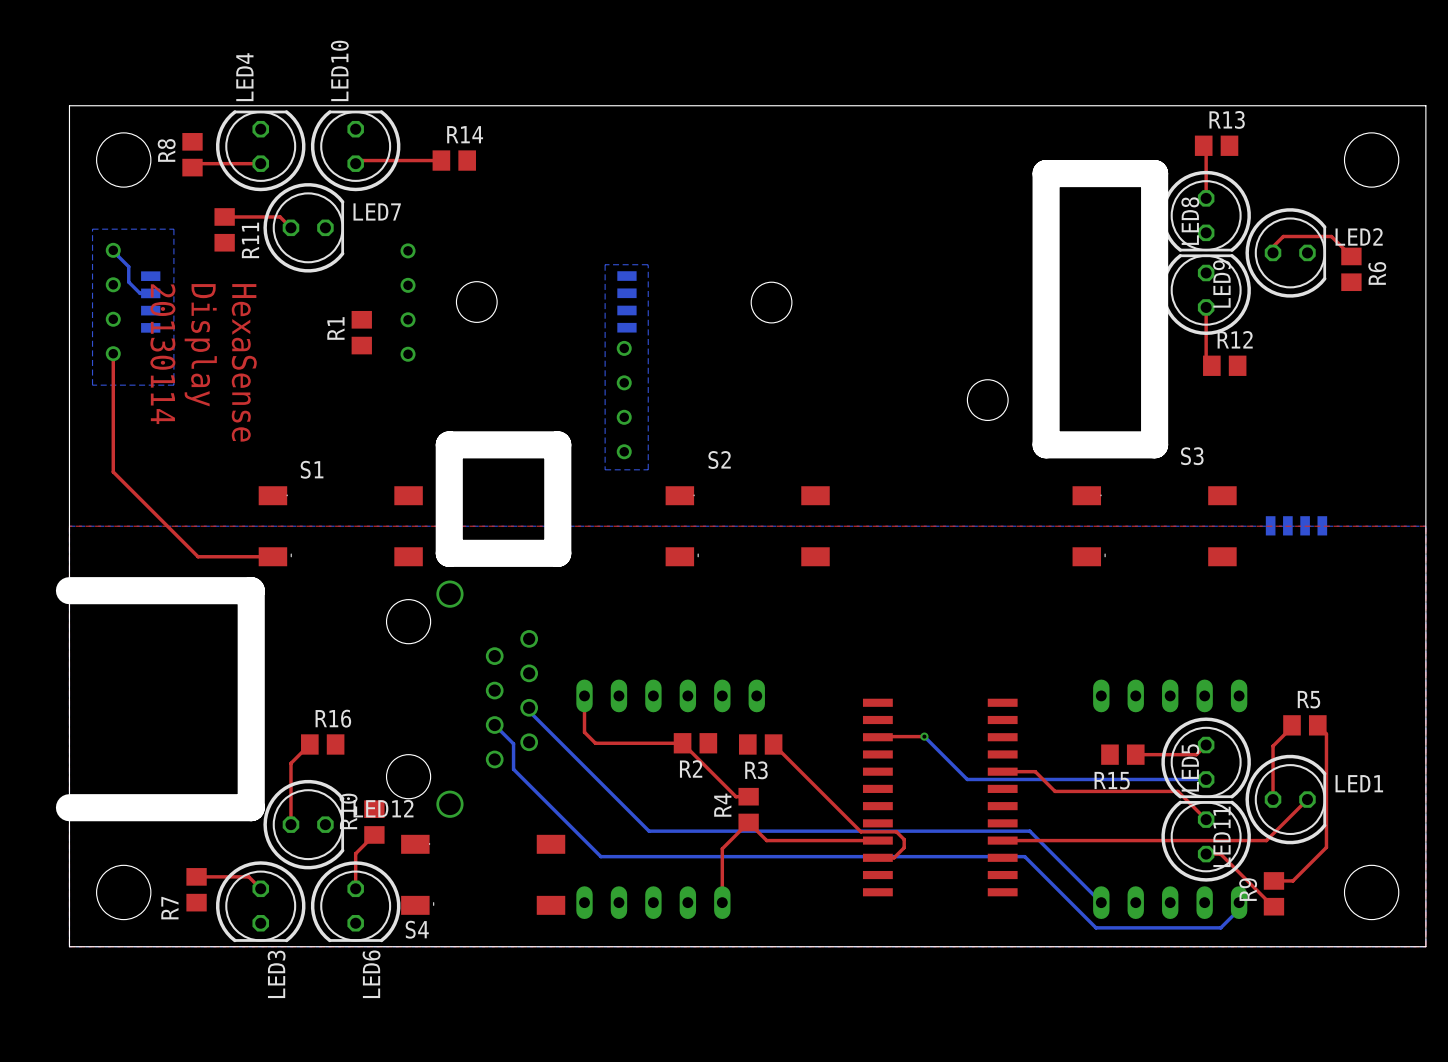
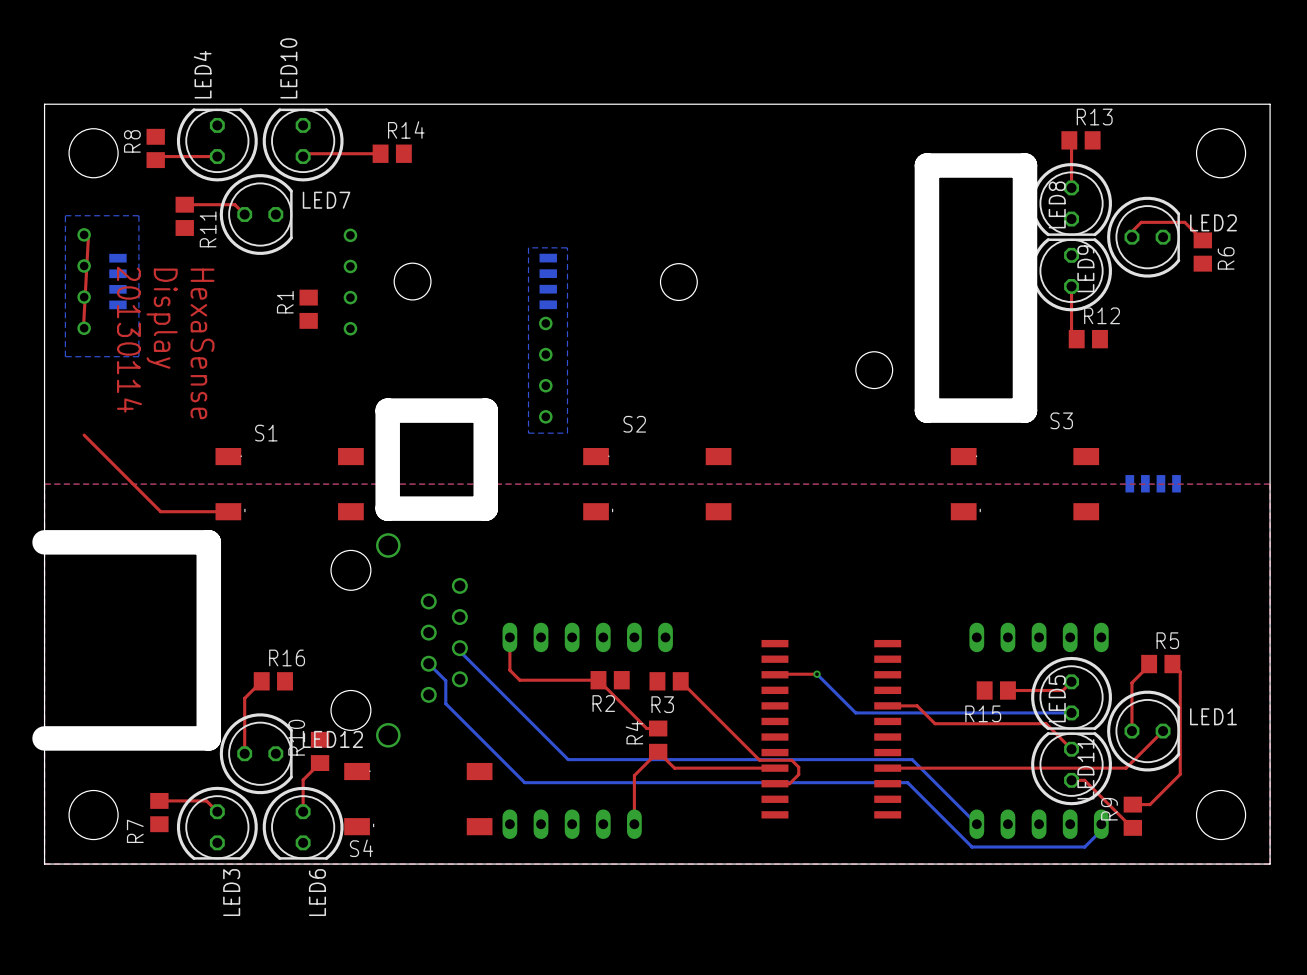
bottom track: (113, 250) (128, 266) (128, 282) (140, 293) (150, 293) -> none
top track: none -> (88, 239) (83, 322)
top track: (113, 353) (113, 471) -> none

